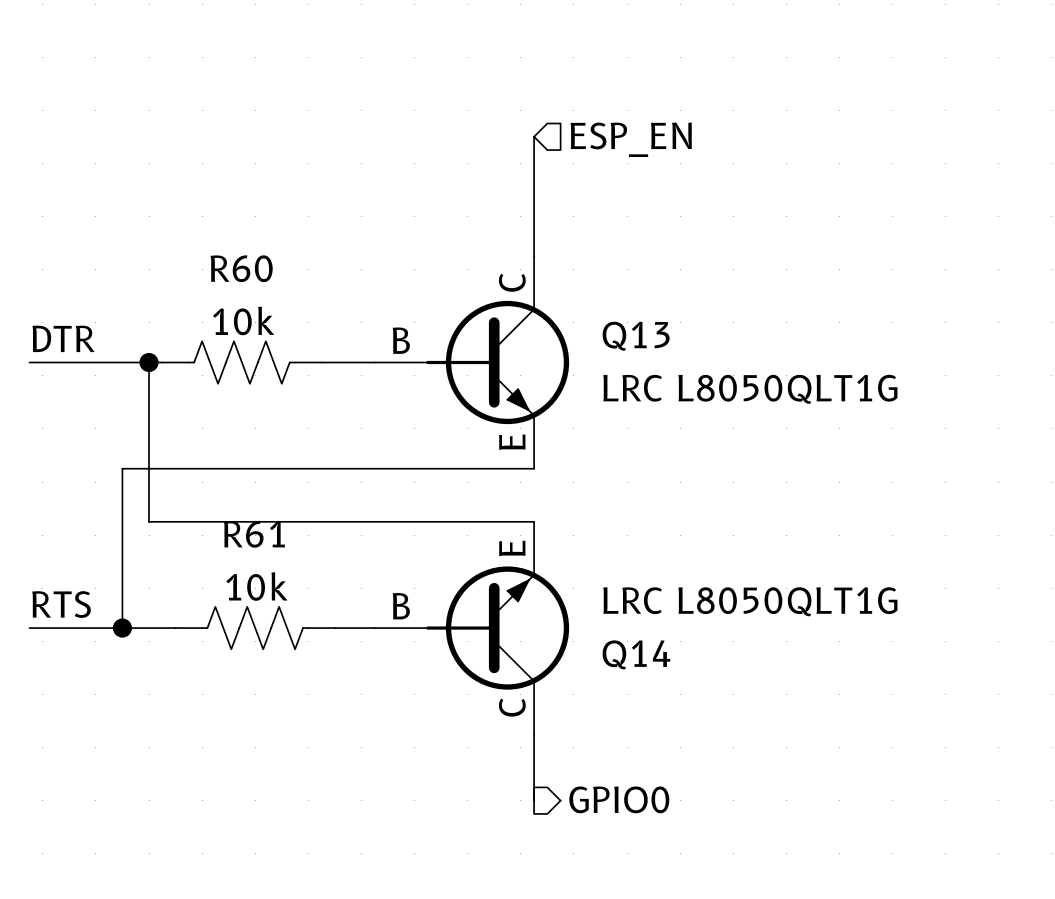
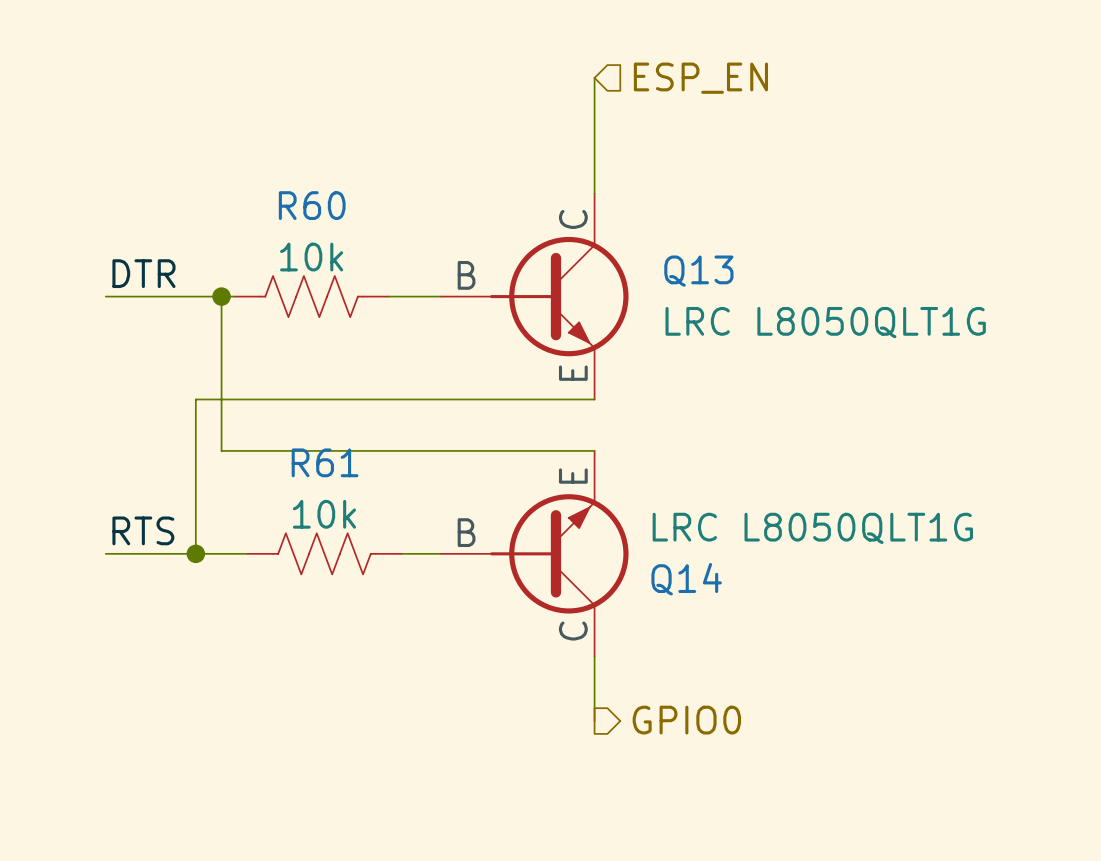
Q14 value position: LRC L8050QLT1G (750, 601) -> LRC L8050QLT1G (812, 528)
Q14 name position: Q14 (636, 654) -> Q14 (686, 579)

